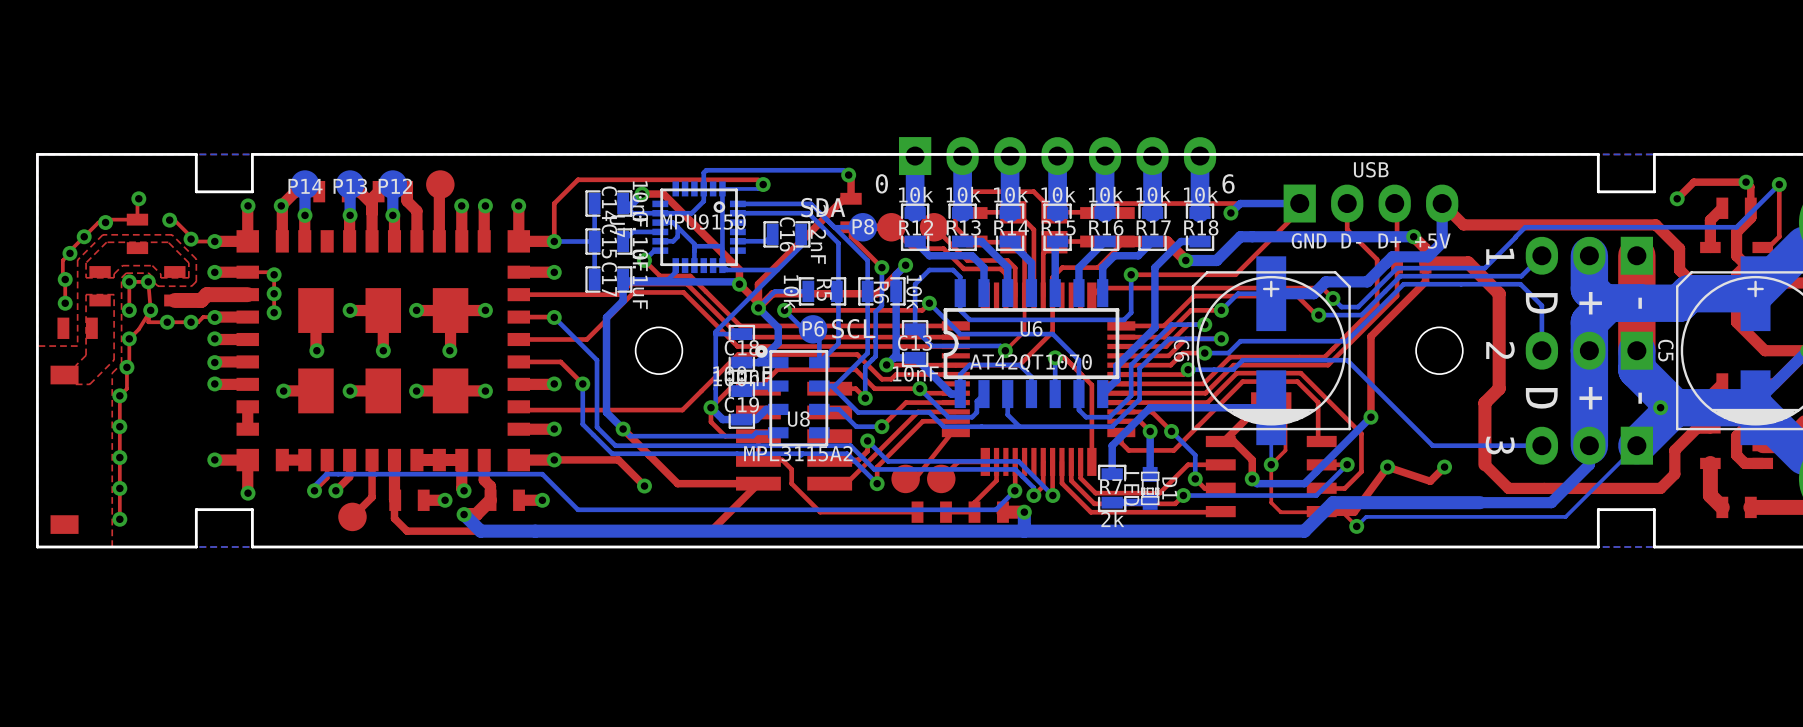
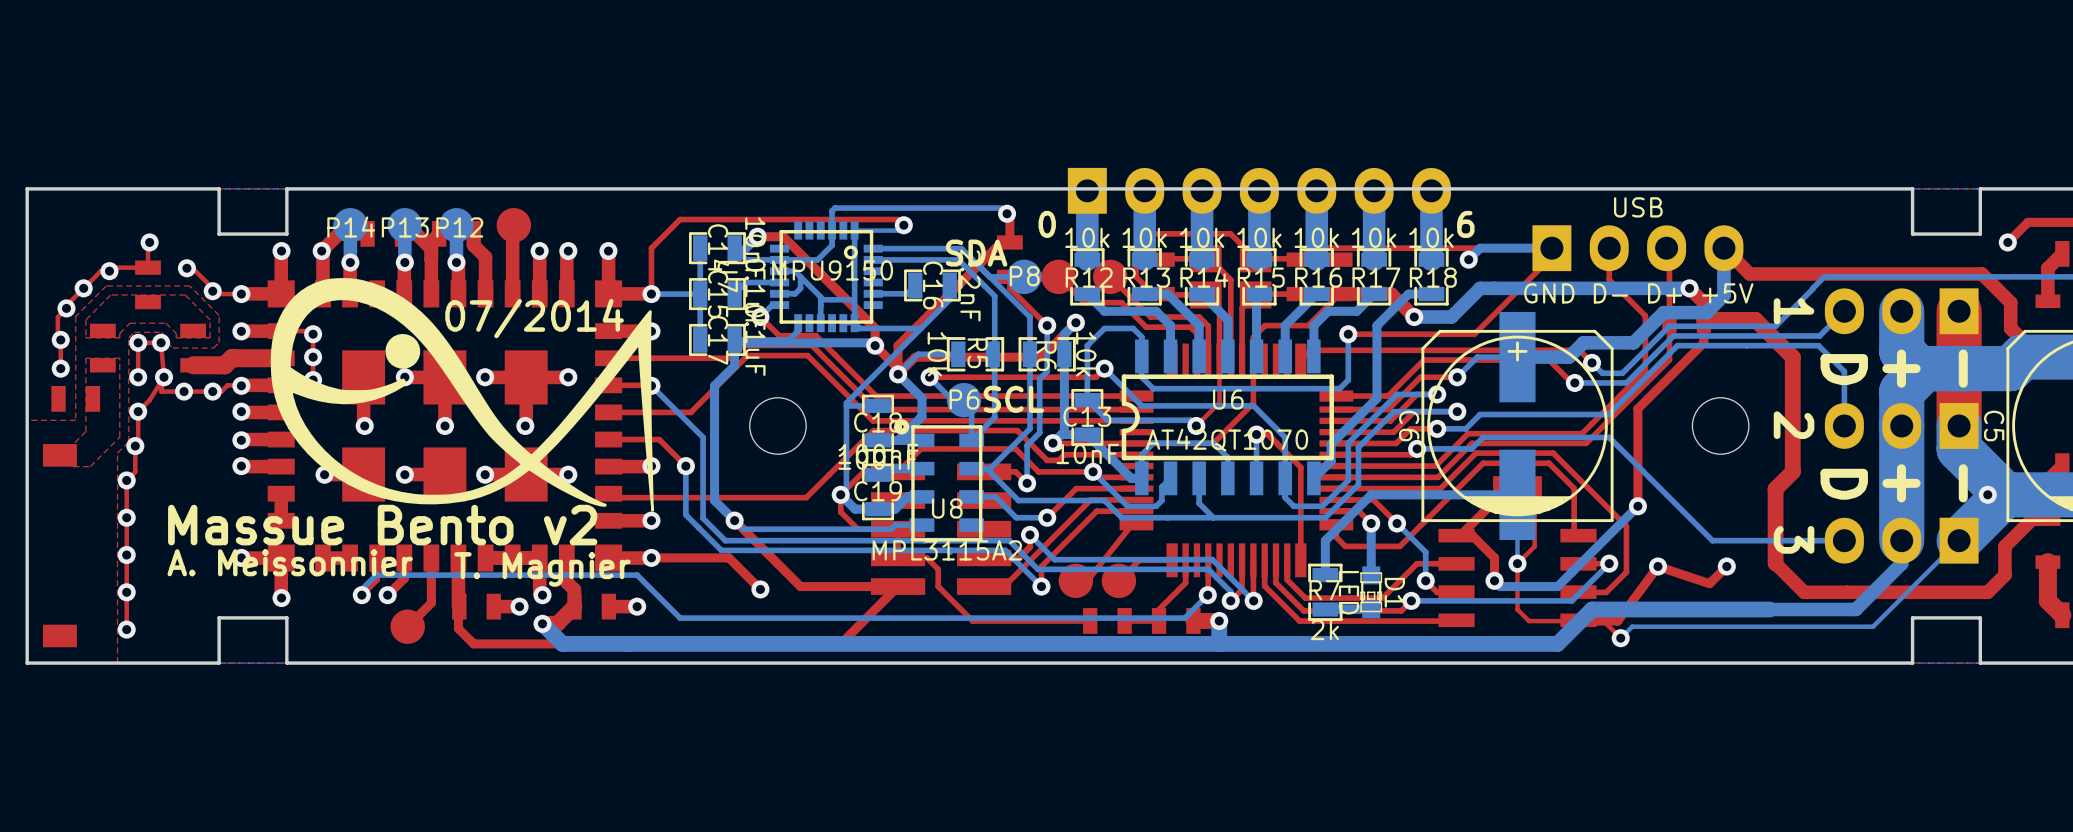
drawing: none -> [270, 278, 654, 512]
text: none -> 07/2014 (534, 318)
text: none -> Massue Bento v2 (382, 525)
text: none -> A. Meissonnier (290, 562)
text: none -> T. Magnier (542, 569)

